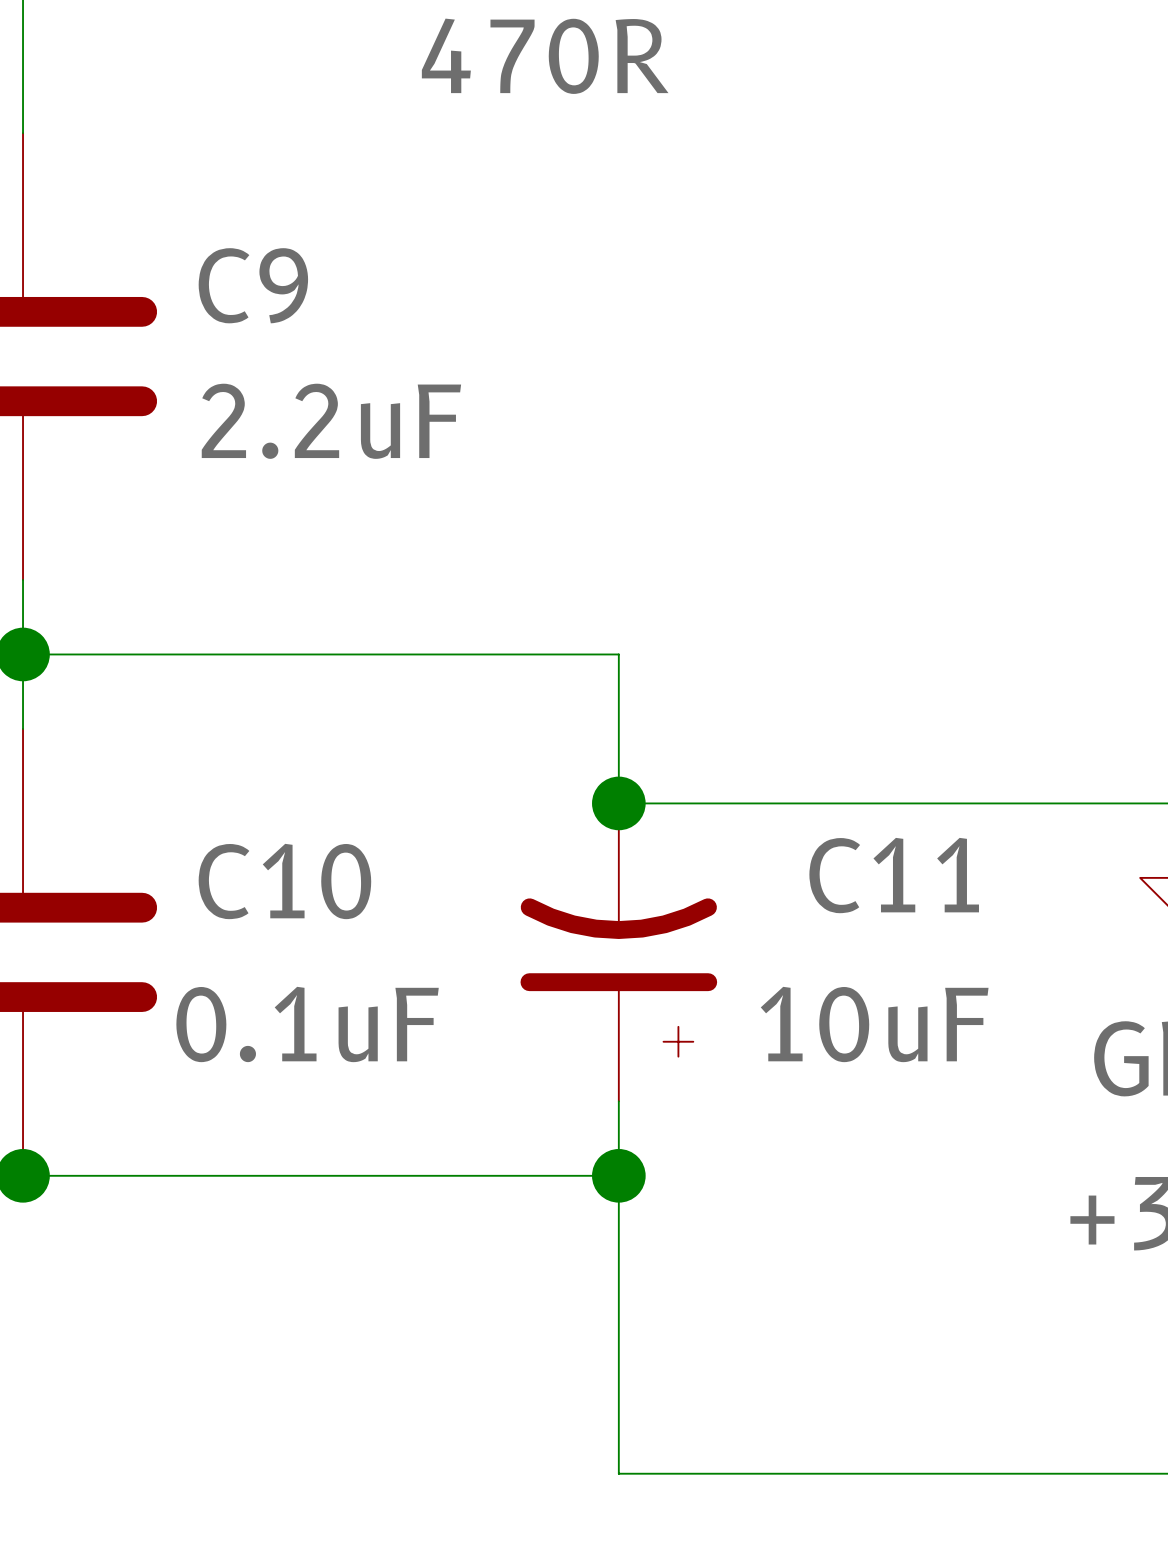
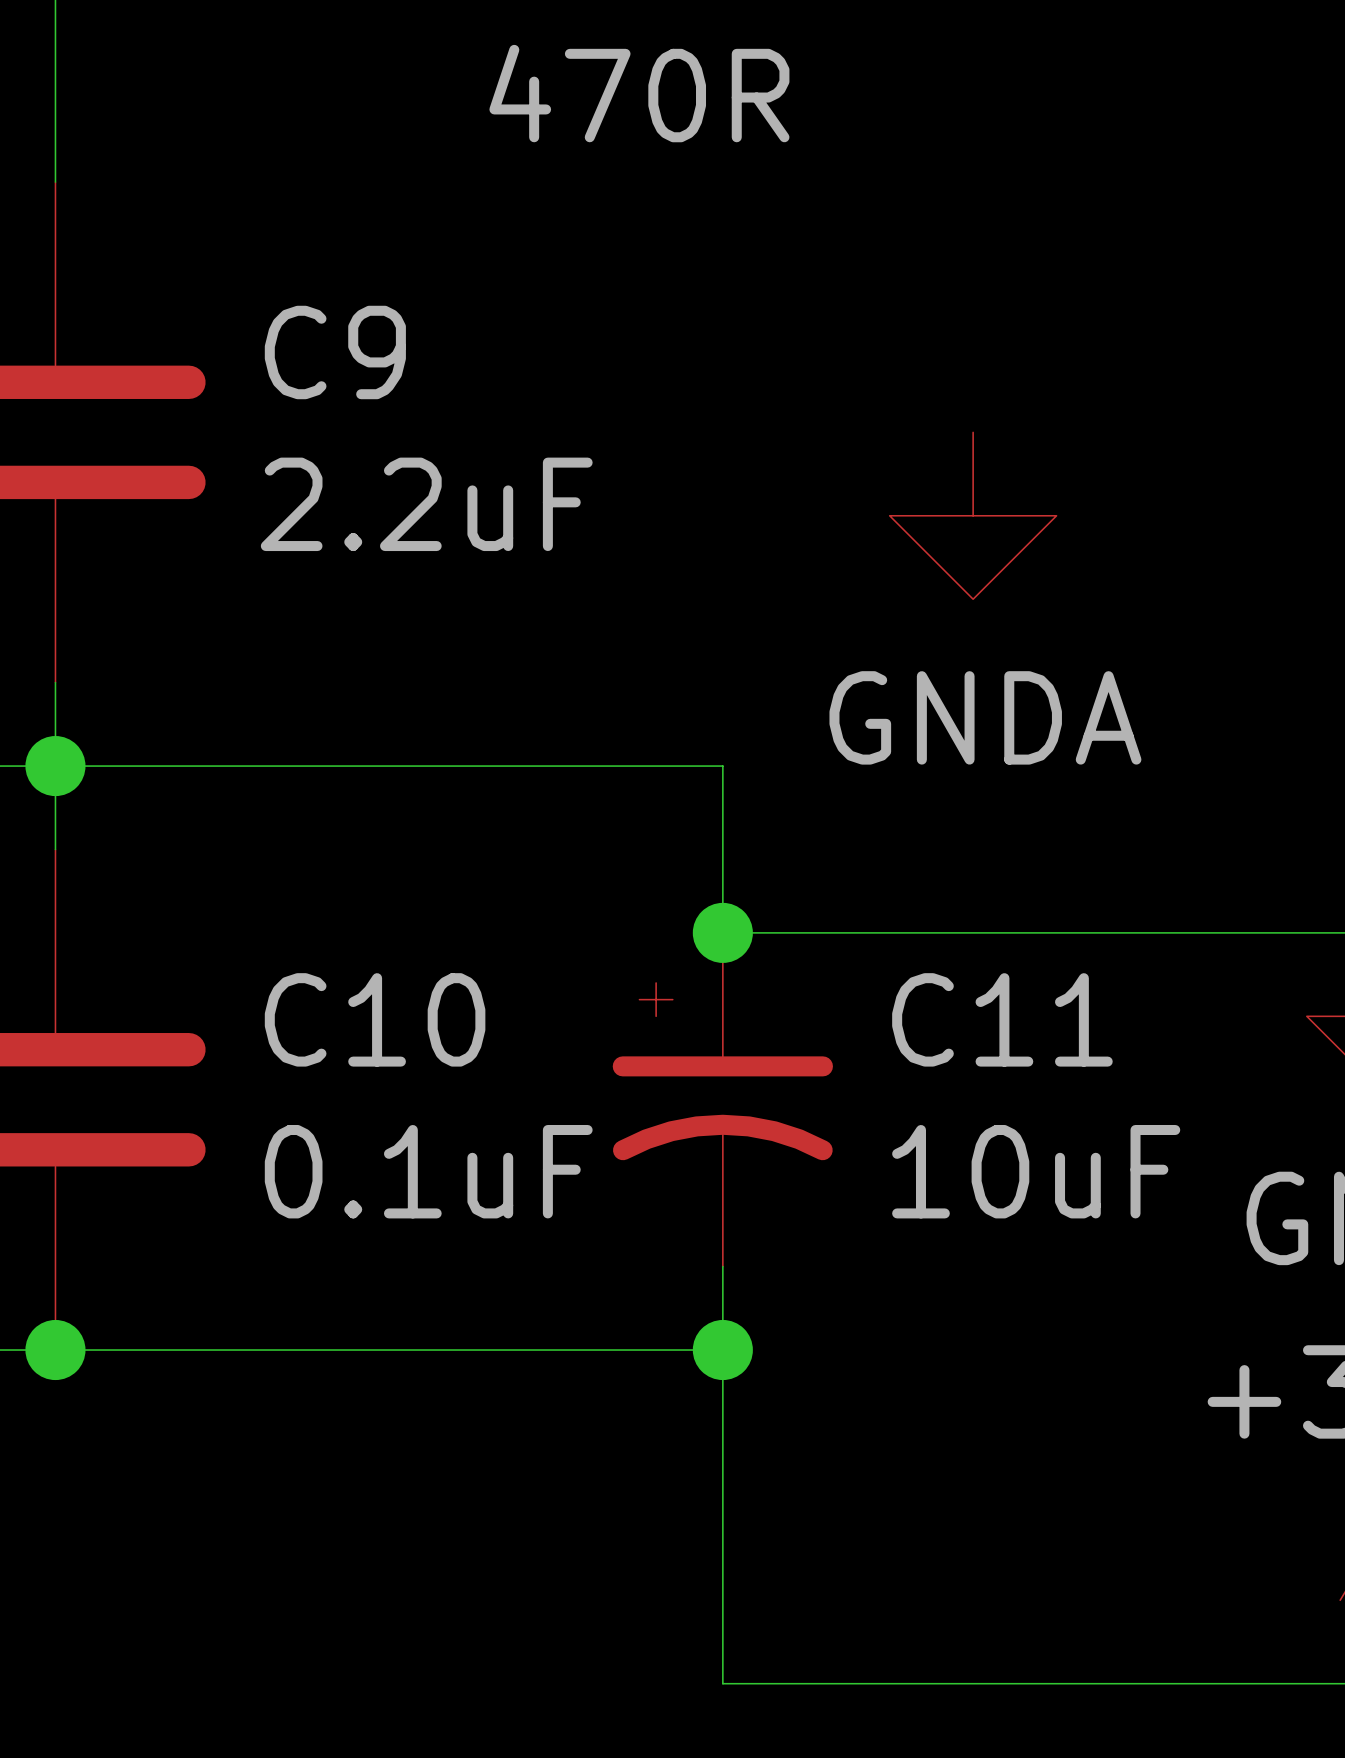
power symbol: none -> GNDA (973, 515)
C11 rotation: 0° (618, 977) -> 180° (722, 1071)
C10 value position: 0.1uF (307, 1024) -> 0.1uF (428, 1171)

